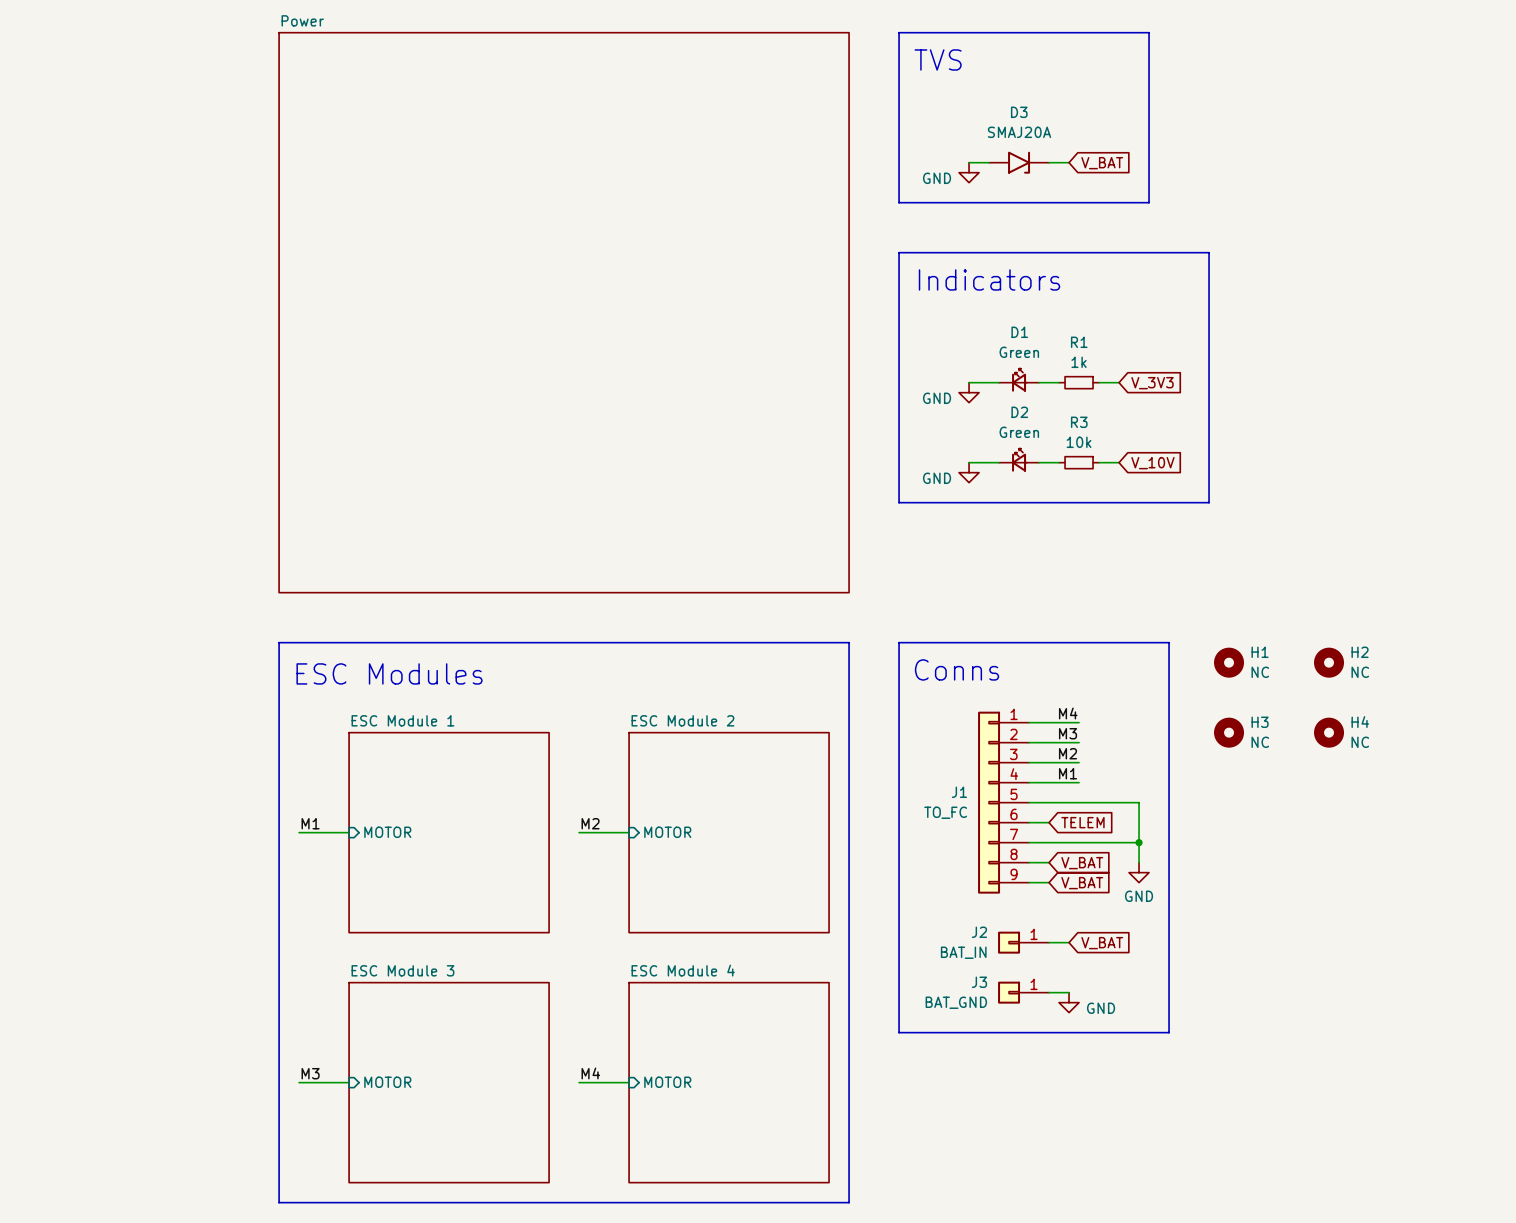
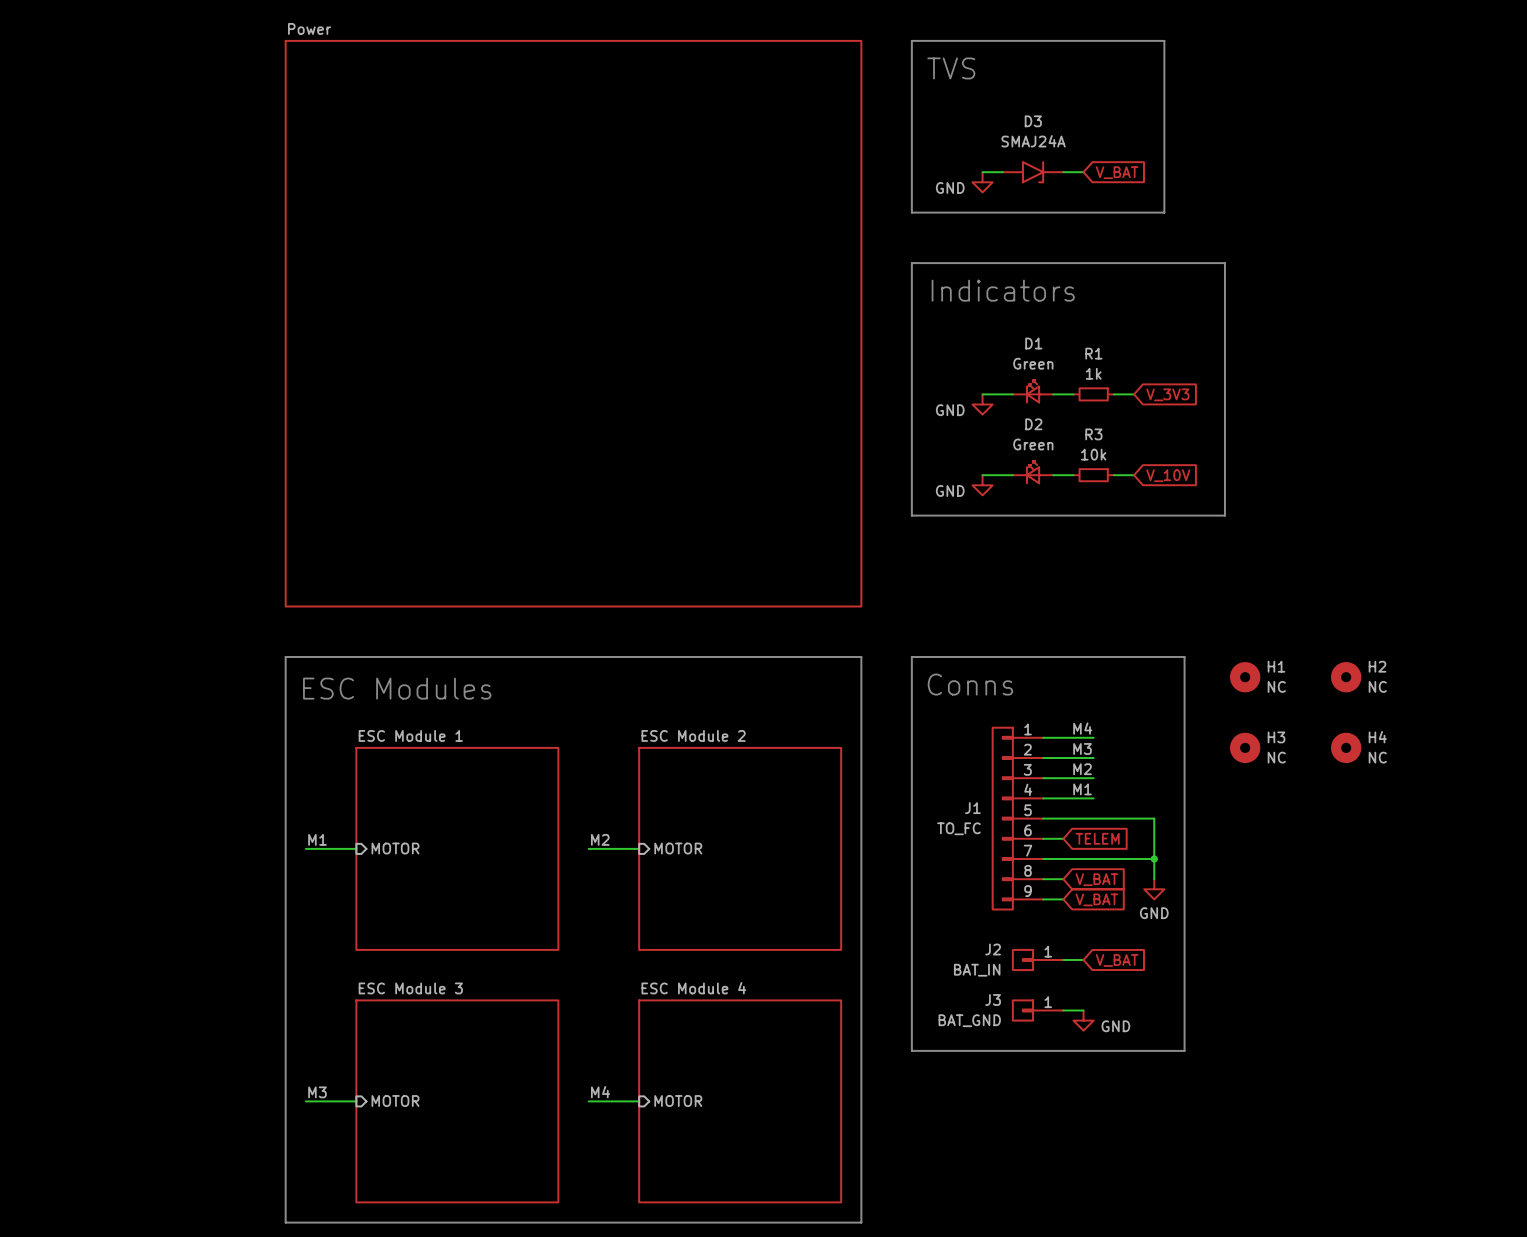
D3 value: SMAJ20A (1019, 132) -> SMAJ24A (1033, 141)

